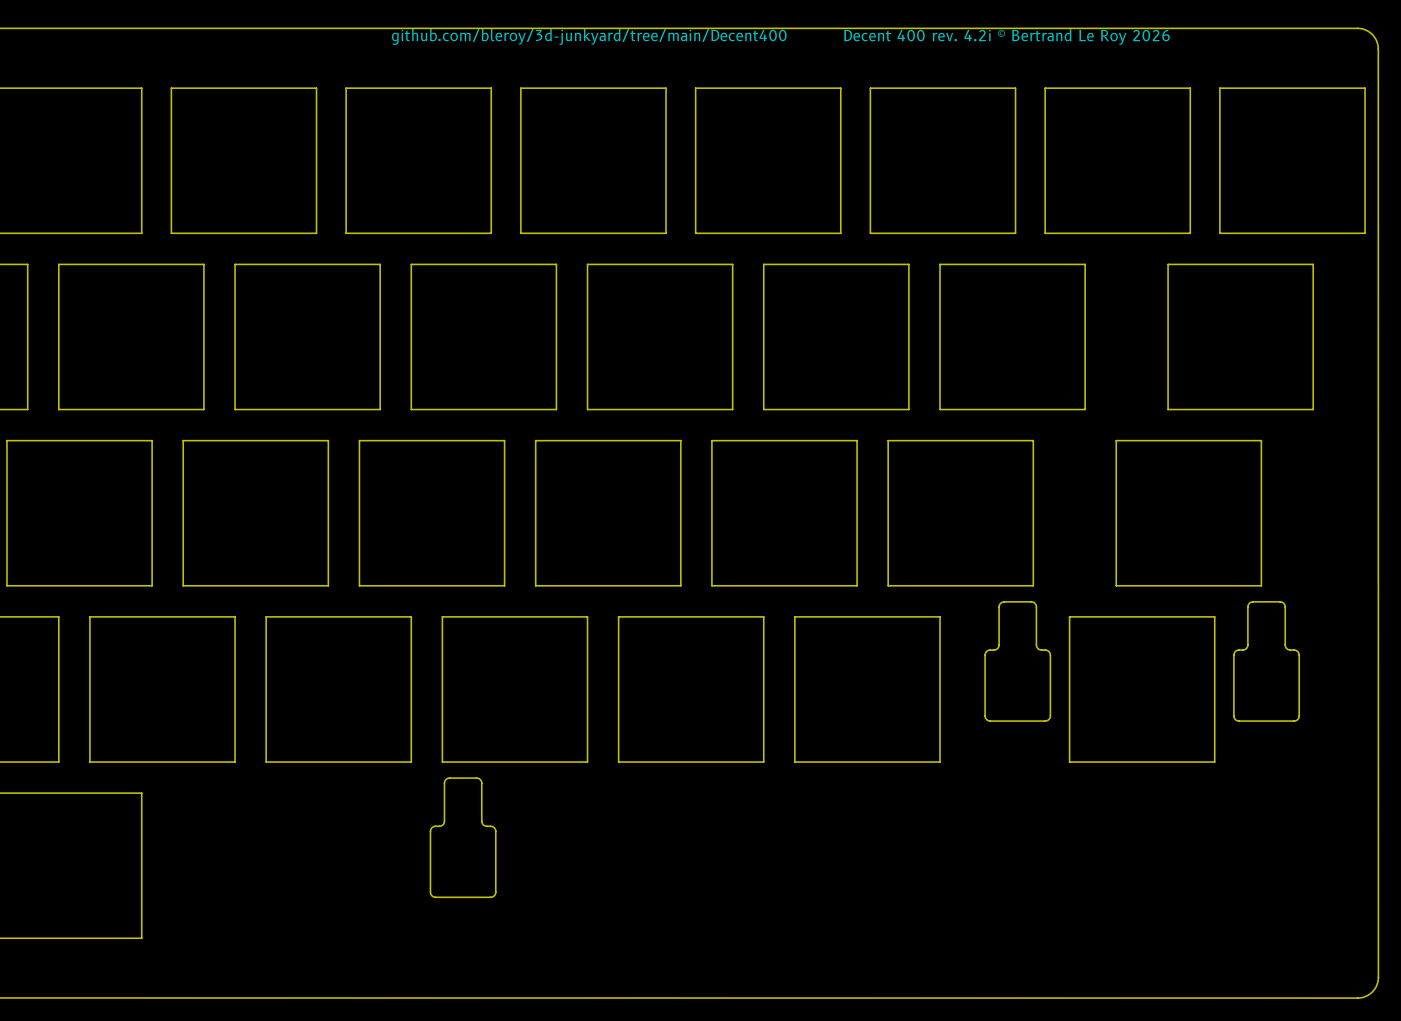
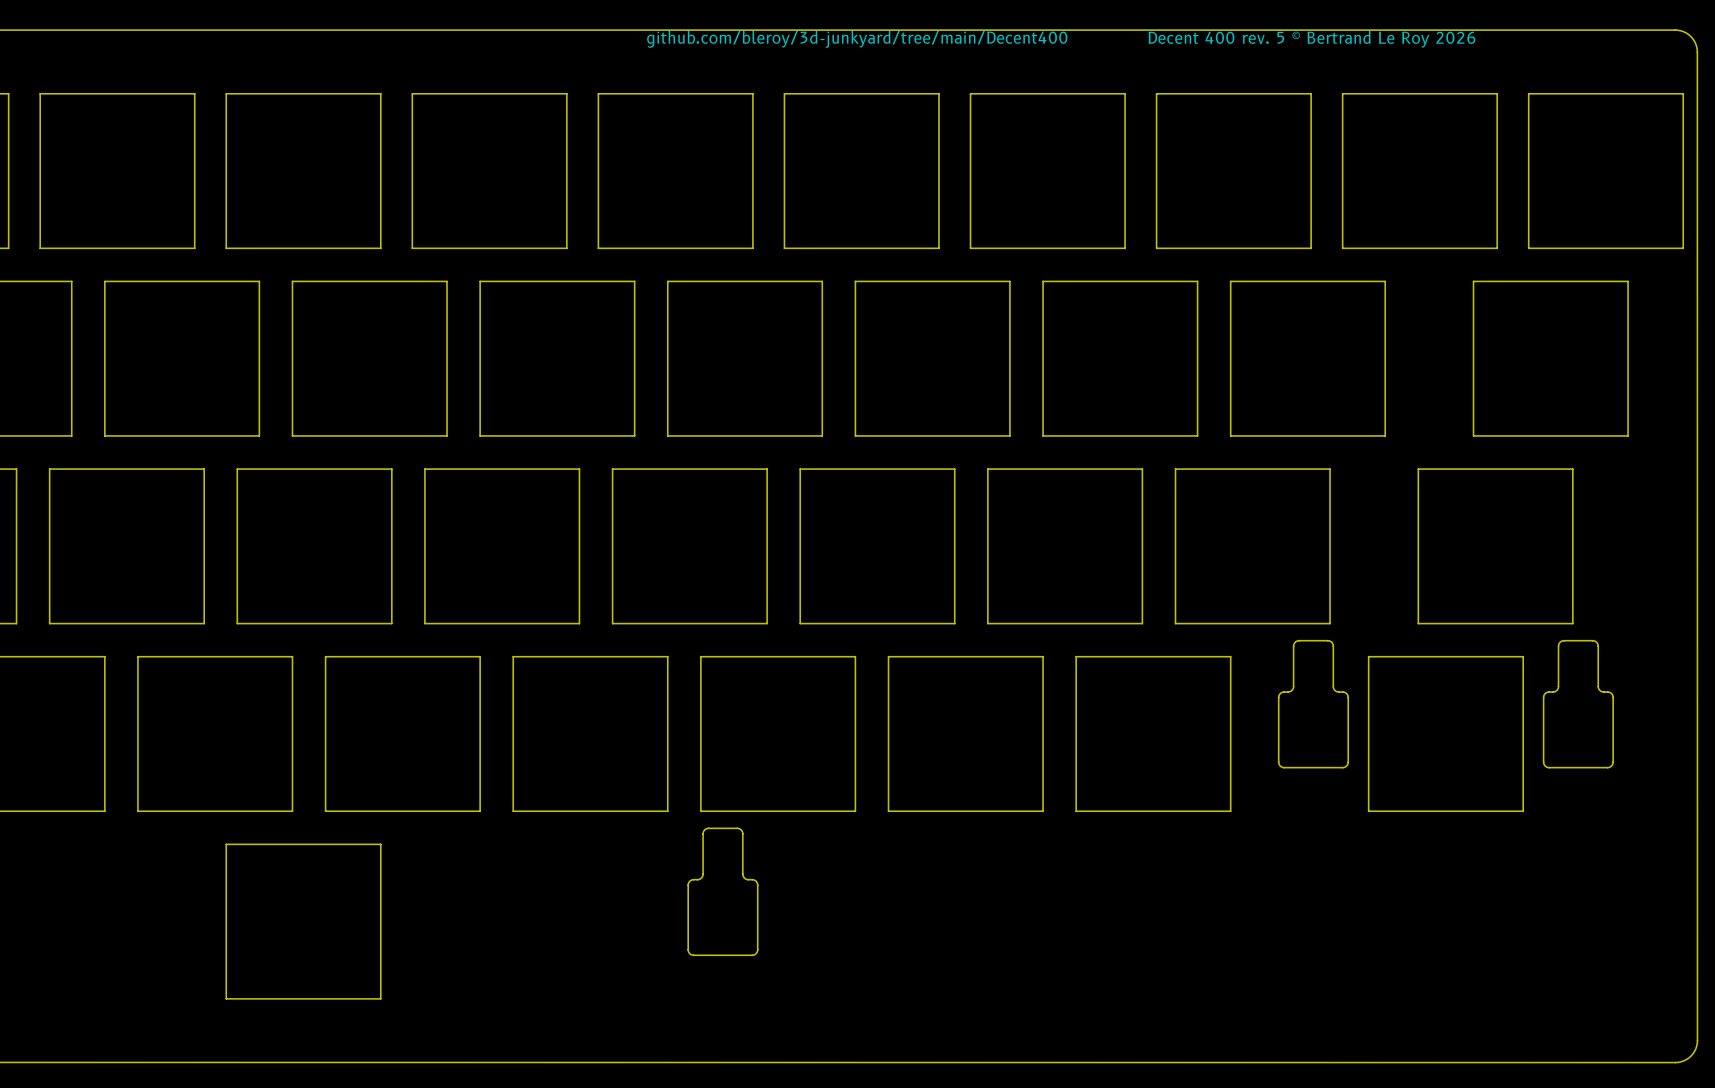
text: Decent 400 rev. 4.2i © Bertrand Le Roy 2026 (1006, 36) -> Decent 400 rev. 5 © Bertrand Le Roy 2026 (1311, 39)

